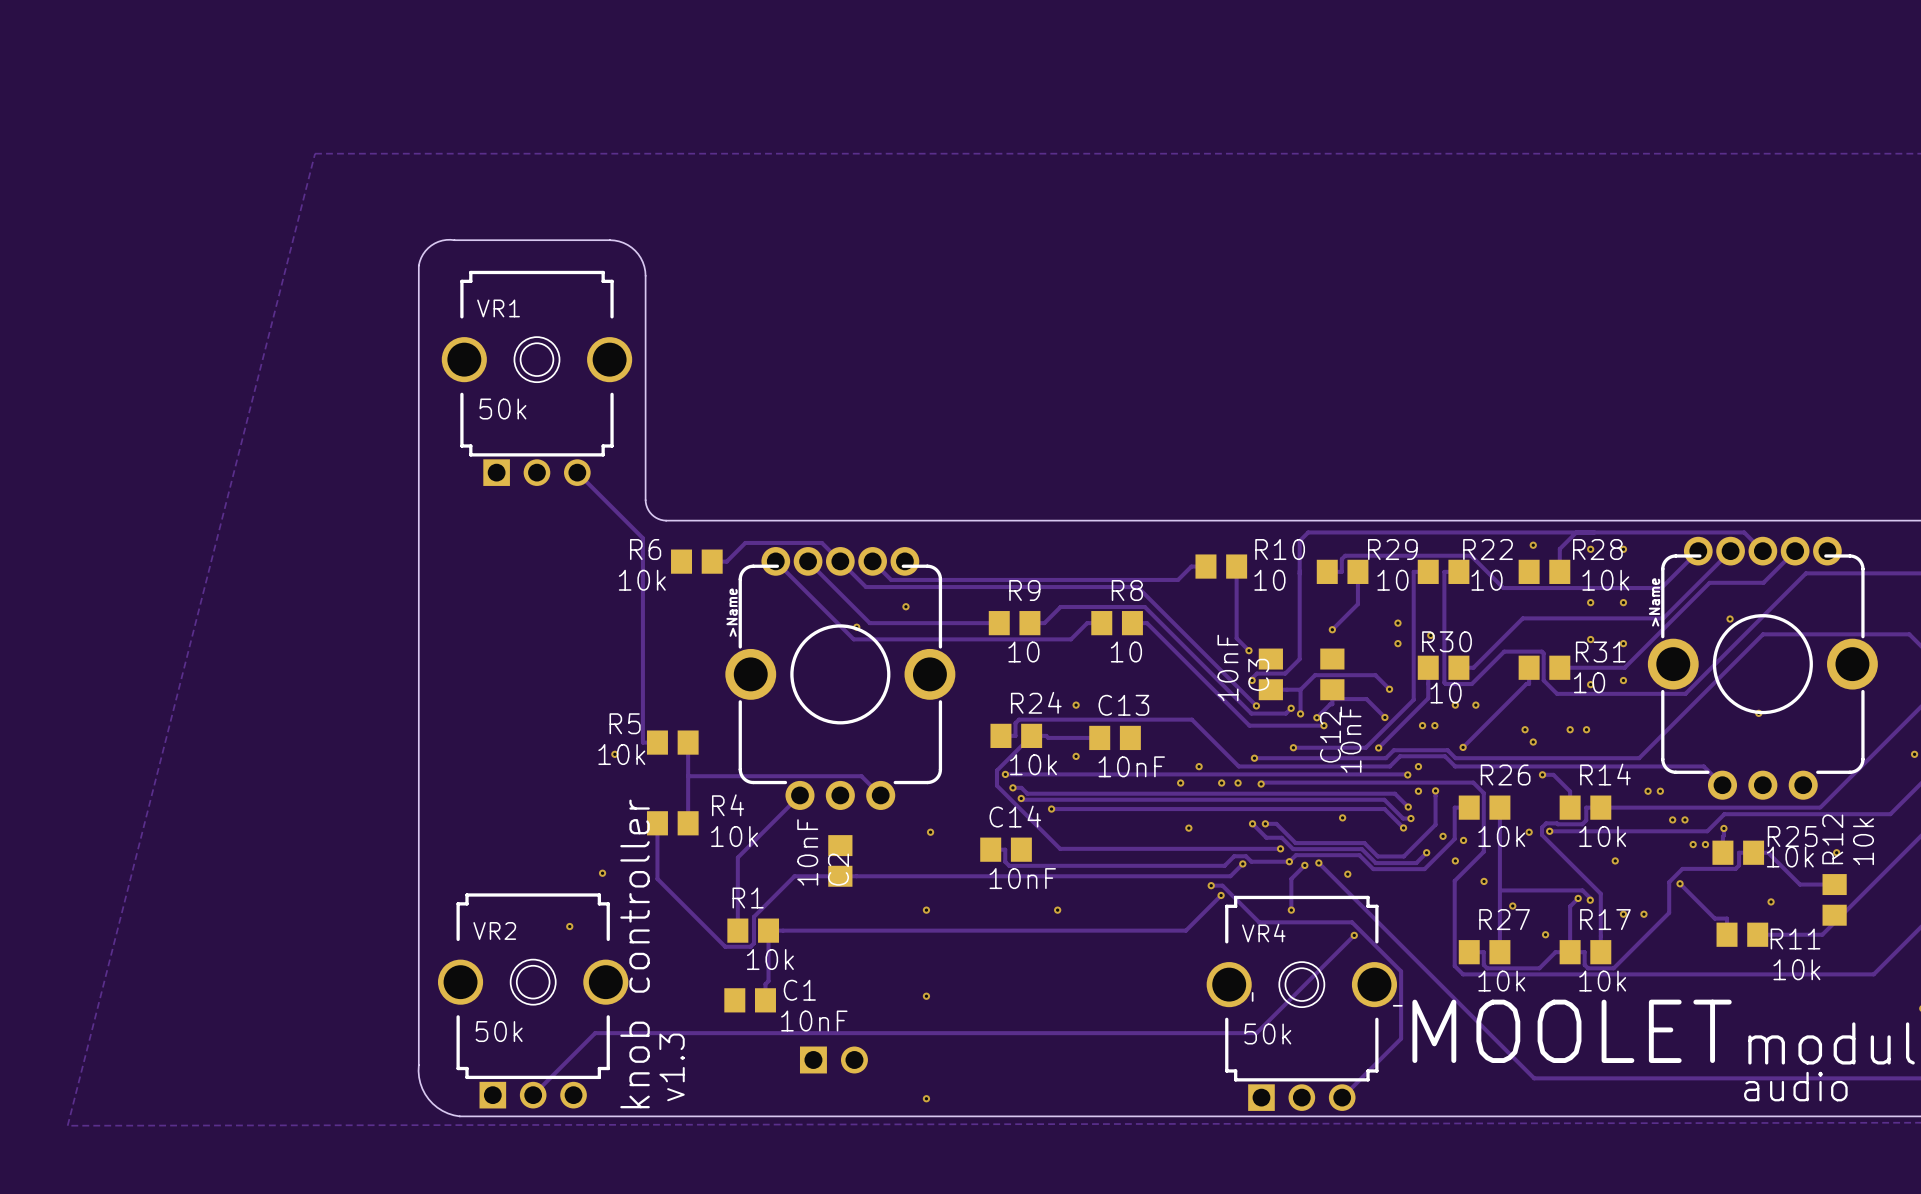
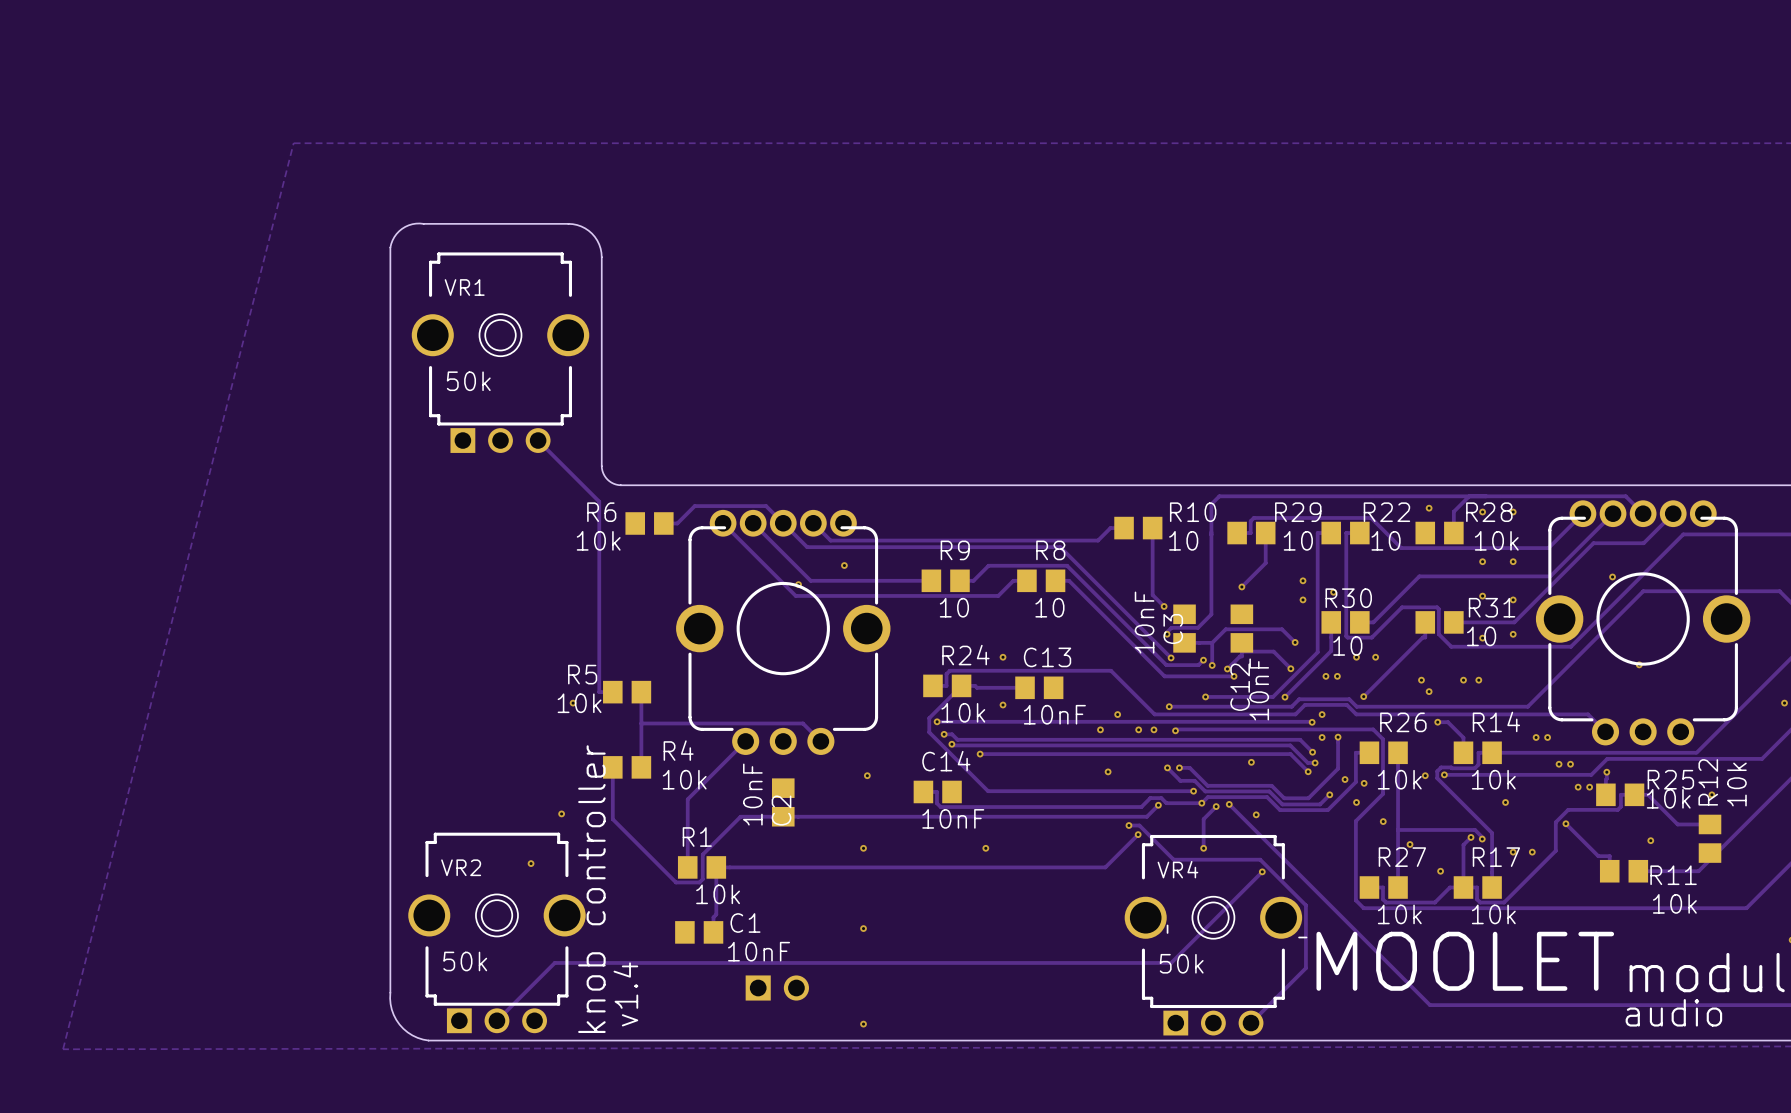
part text: >Name (1654, 602) -> none
part text: >Name (732, 612) -> none
text: v1.3 (672, 1067) -> v1.4 (625, 994)

